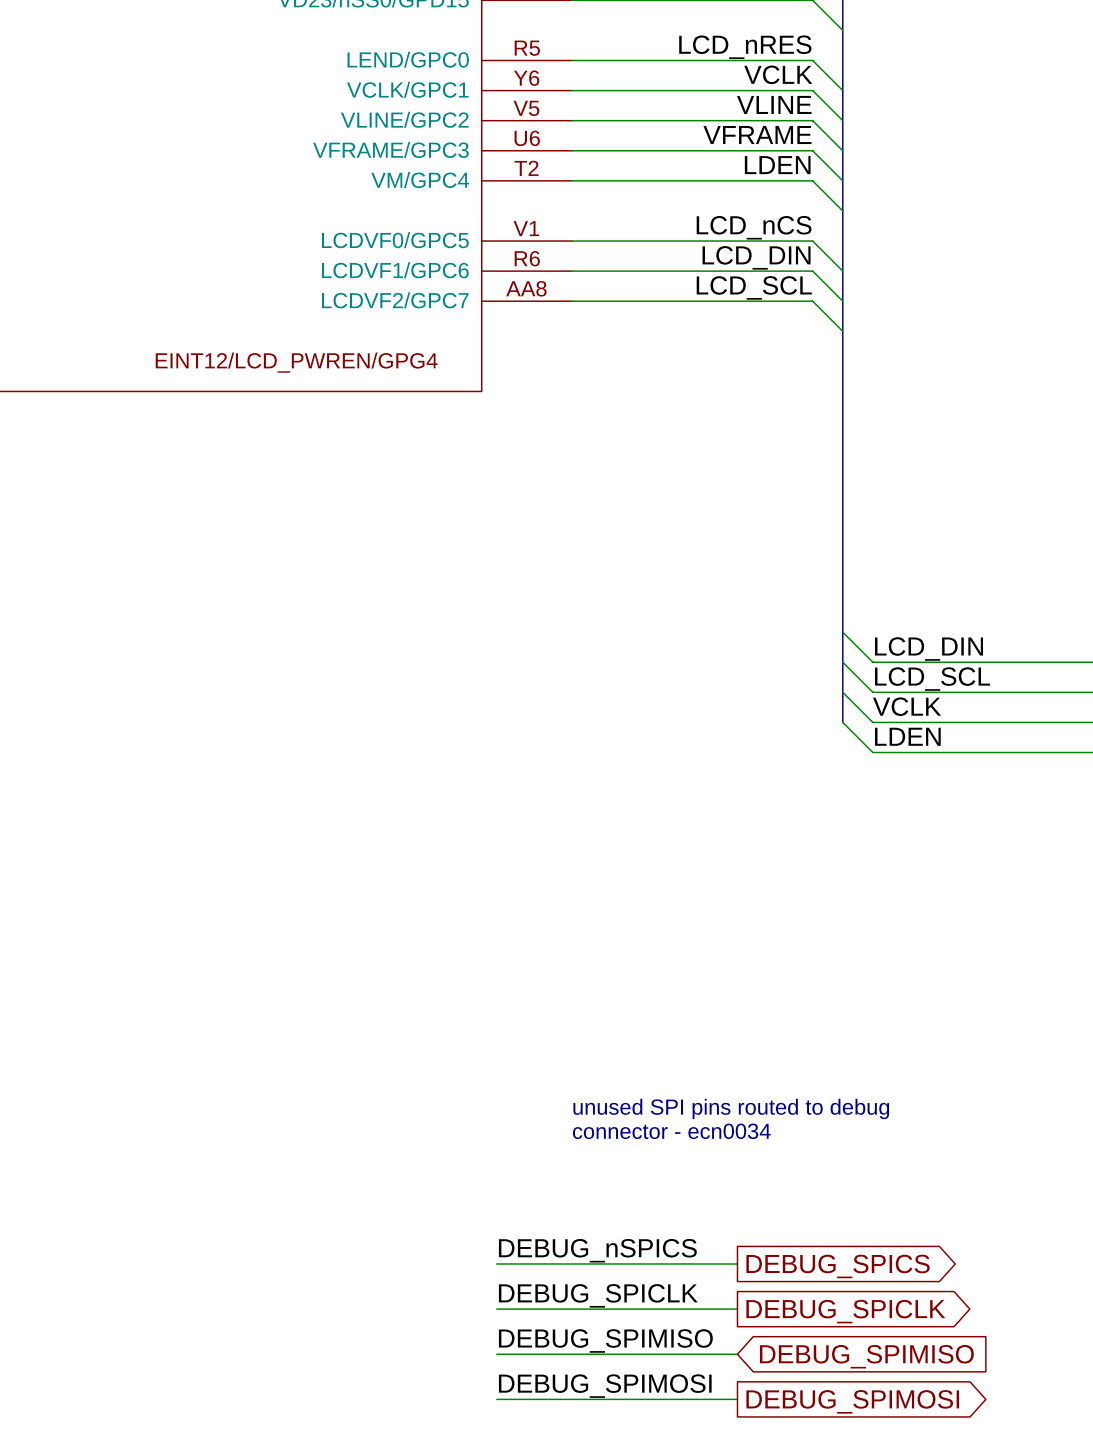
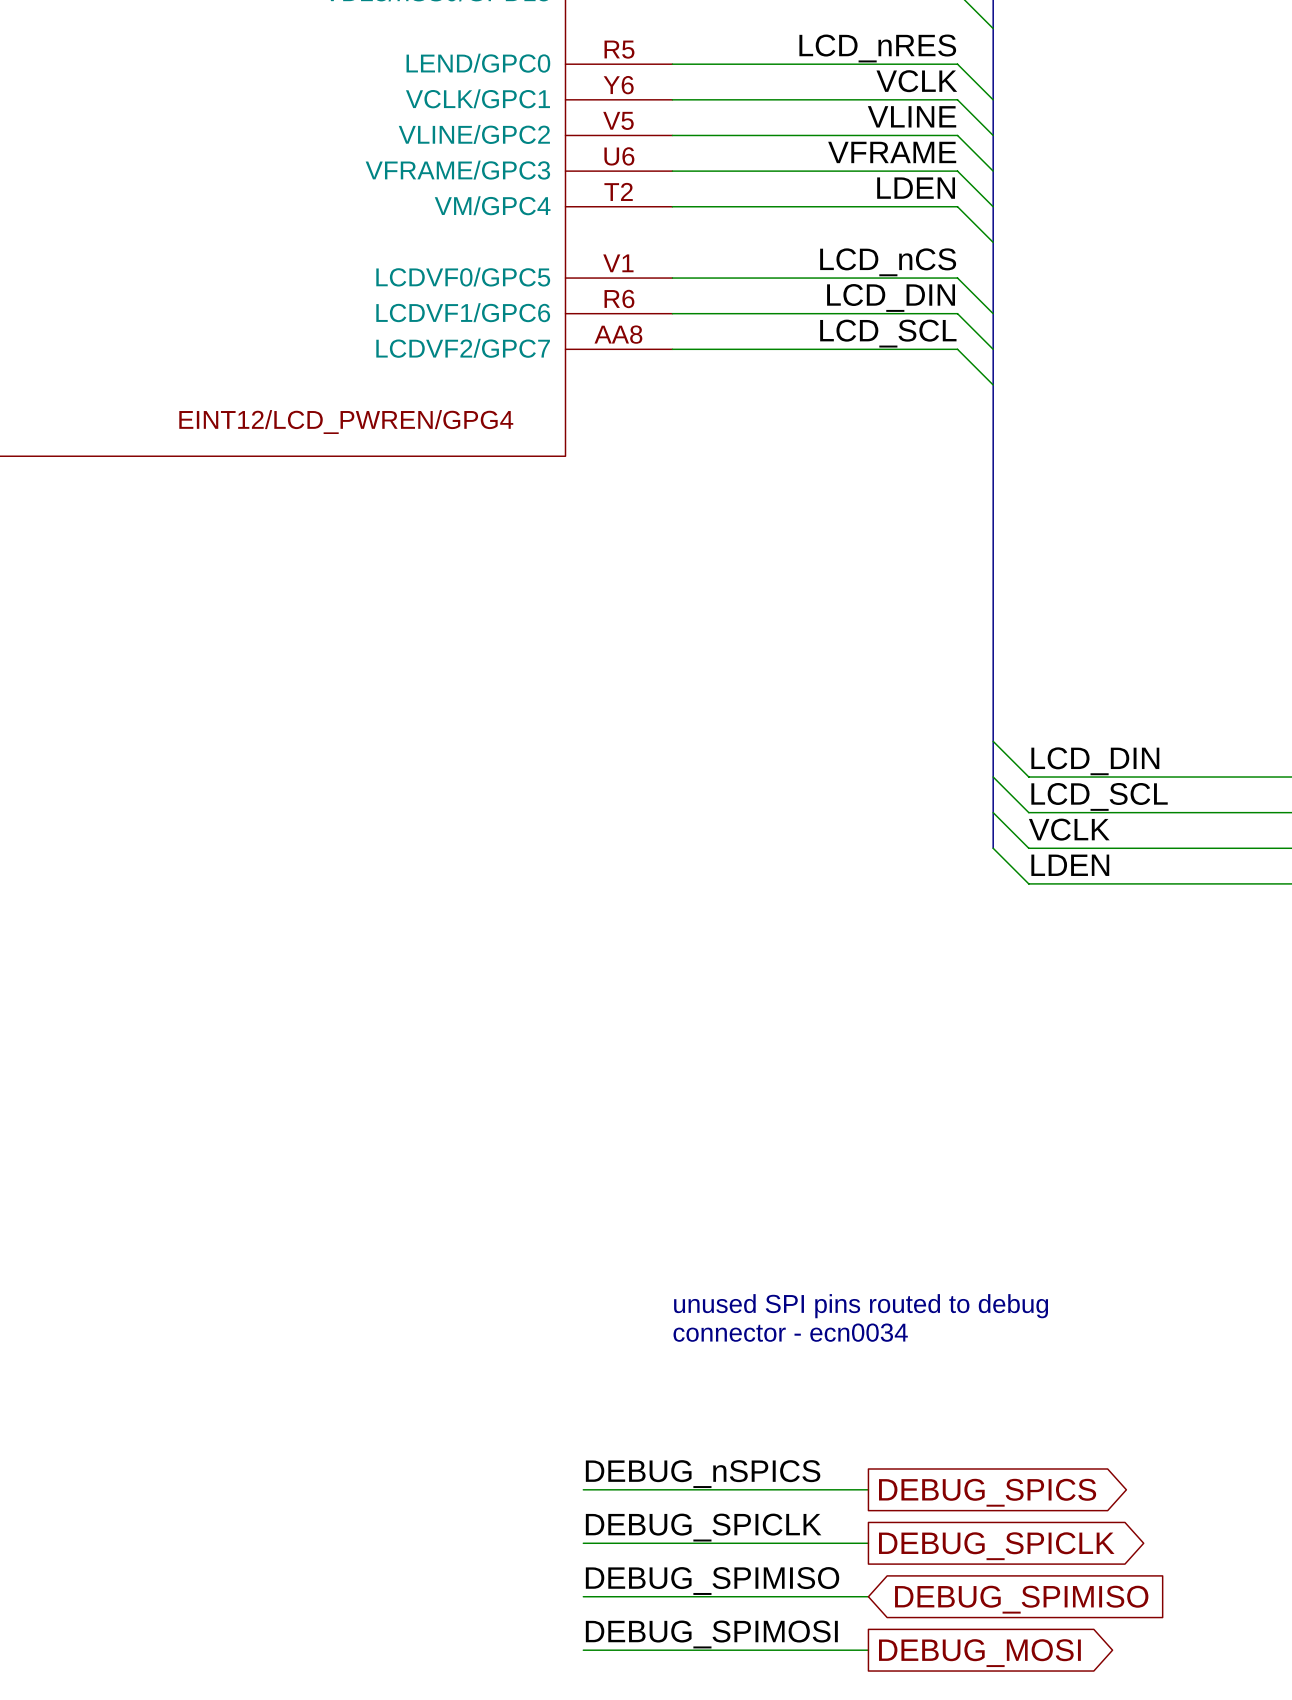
global label: DEBUG_SPIMOSI (852, 1401) -> DEBUG_MOSI (979, 1653)

